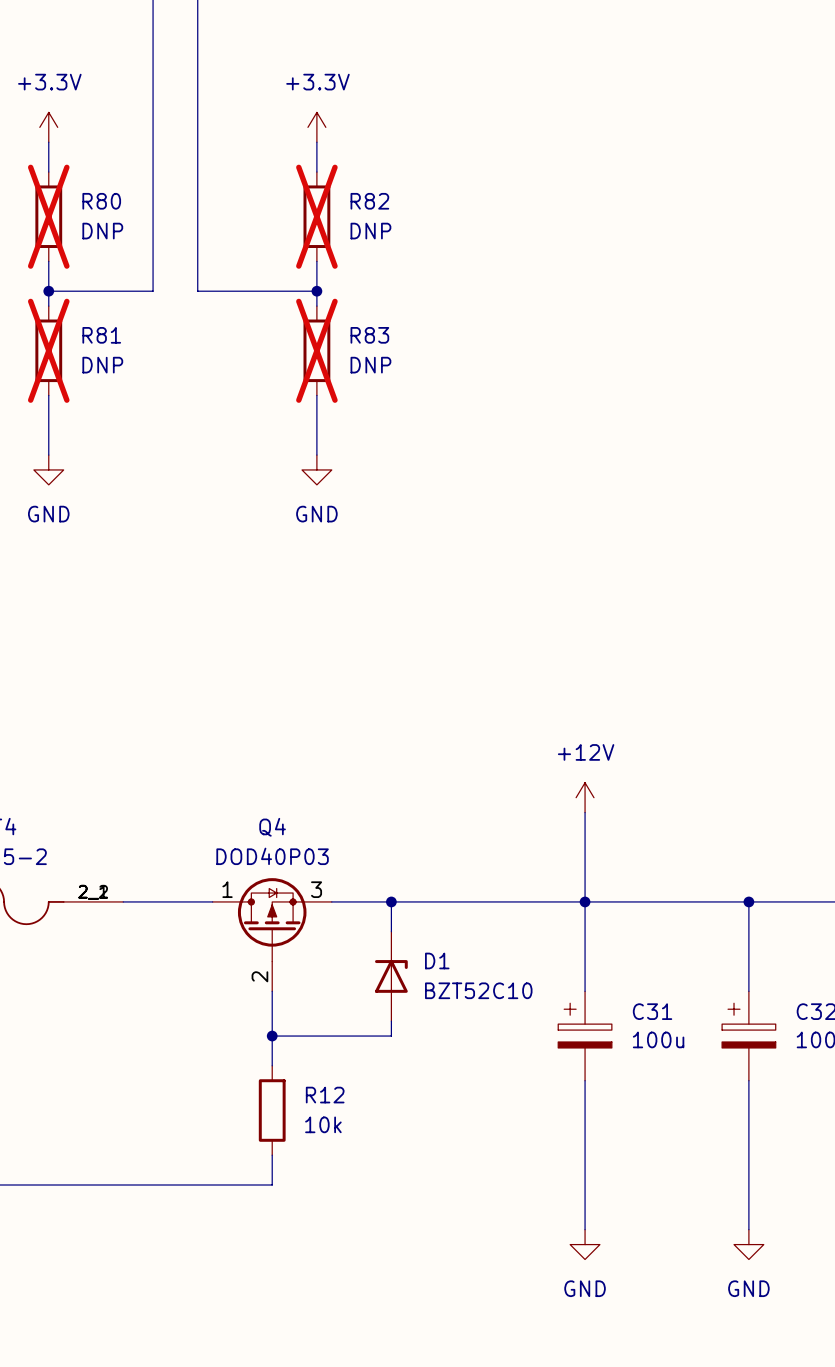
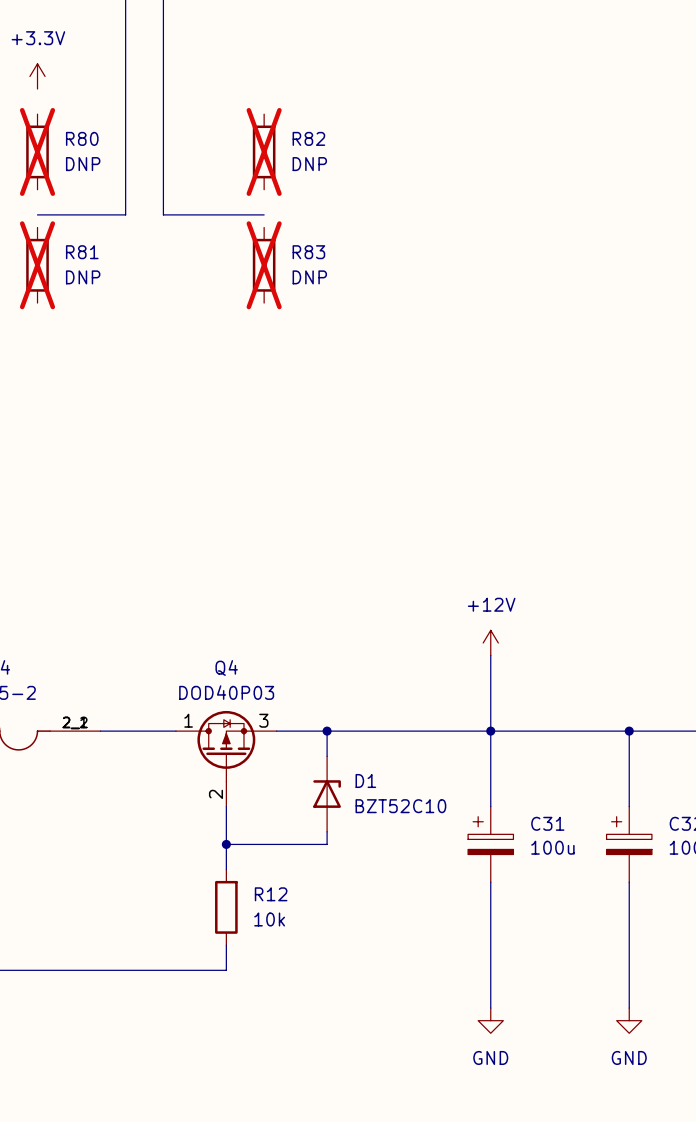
power symbol: +3.3V (316, 127) -> none
wire: (48, 142) (48, 172) -> none
wire: (316, 142) (316, 172) -> none
wire: (48, 261) (48, 306) -> none
wire: (316, 261) (316, 306) -> none
junction: (48, 291) -> none
junction: (316, 291) -> none
wire: (48, 395) (48, 455) -> none
wire: (316, 395) (316, 455) -> none
power symbol: GND (48, 469) -> none
power symbol: GND (316, 469) -> none

